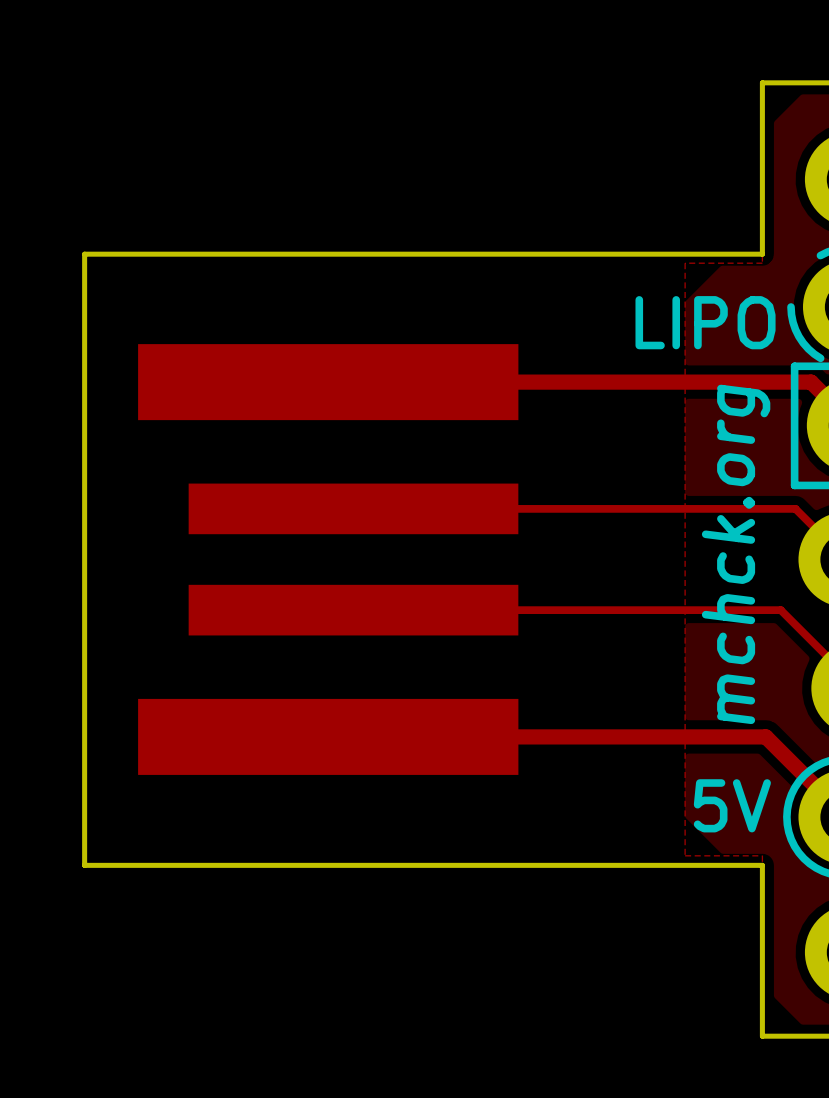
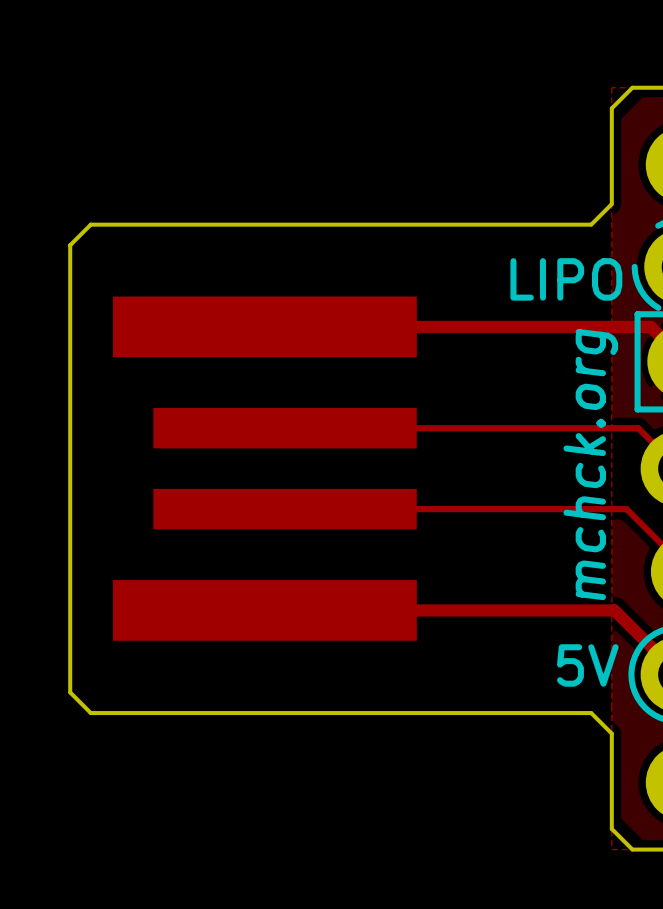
board edge: (788, 82) (762, 82) (762, 108) -> (632, 87) (611, 108)
board edge: (762, 228) (762, 254) (736, 254) -> (611, 204) (591, 224)
board edge: (110, 254) (84, 254) (84, 279) -> (90, 224) (70, 245)
zone outline: (762, 263) (685, 263) (685, 855) (762, 855) -> (611, 231) (611, 705)
board edge: (84, 839) (84, 865) (110, 865) -> (70, 692) (90, 713)
board edge: (736, 865) (762, 865) (762, 891) -> (591, 713) (611, 733)
board edge: (762, 1010) (762, 1036) (788, 1036) -> (611, 828) (632, 849)

